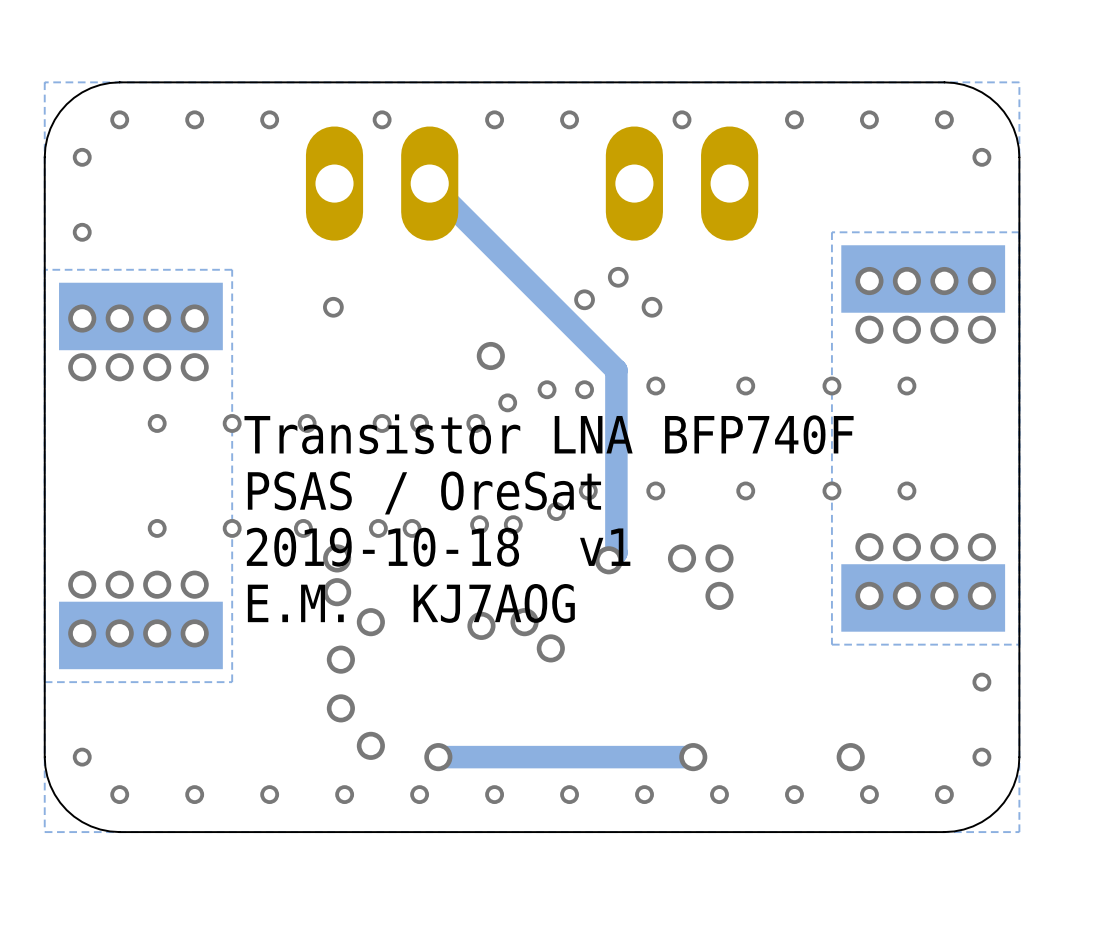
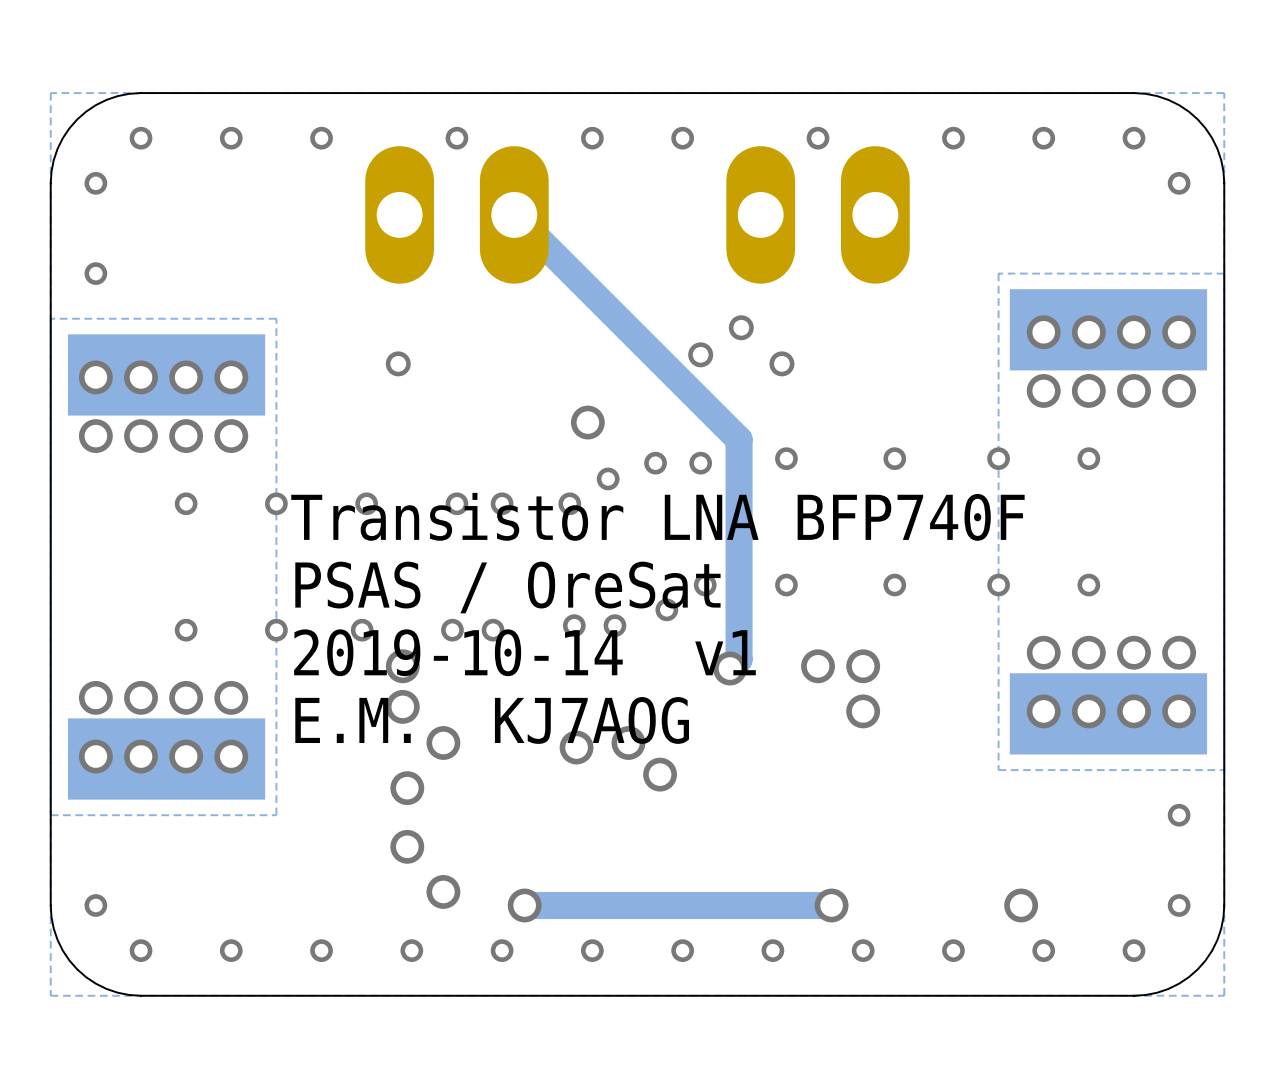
text: 2019-10-18 v1 (438, 547) -> 2019-10-14 v1 (524, 652)

